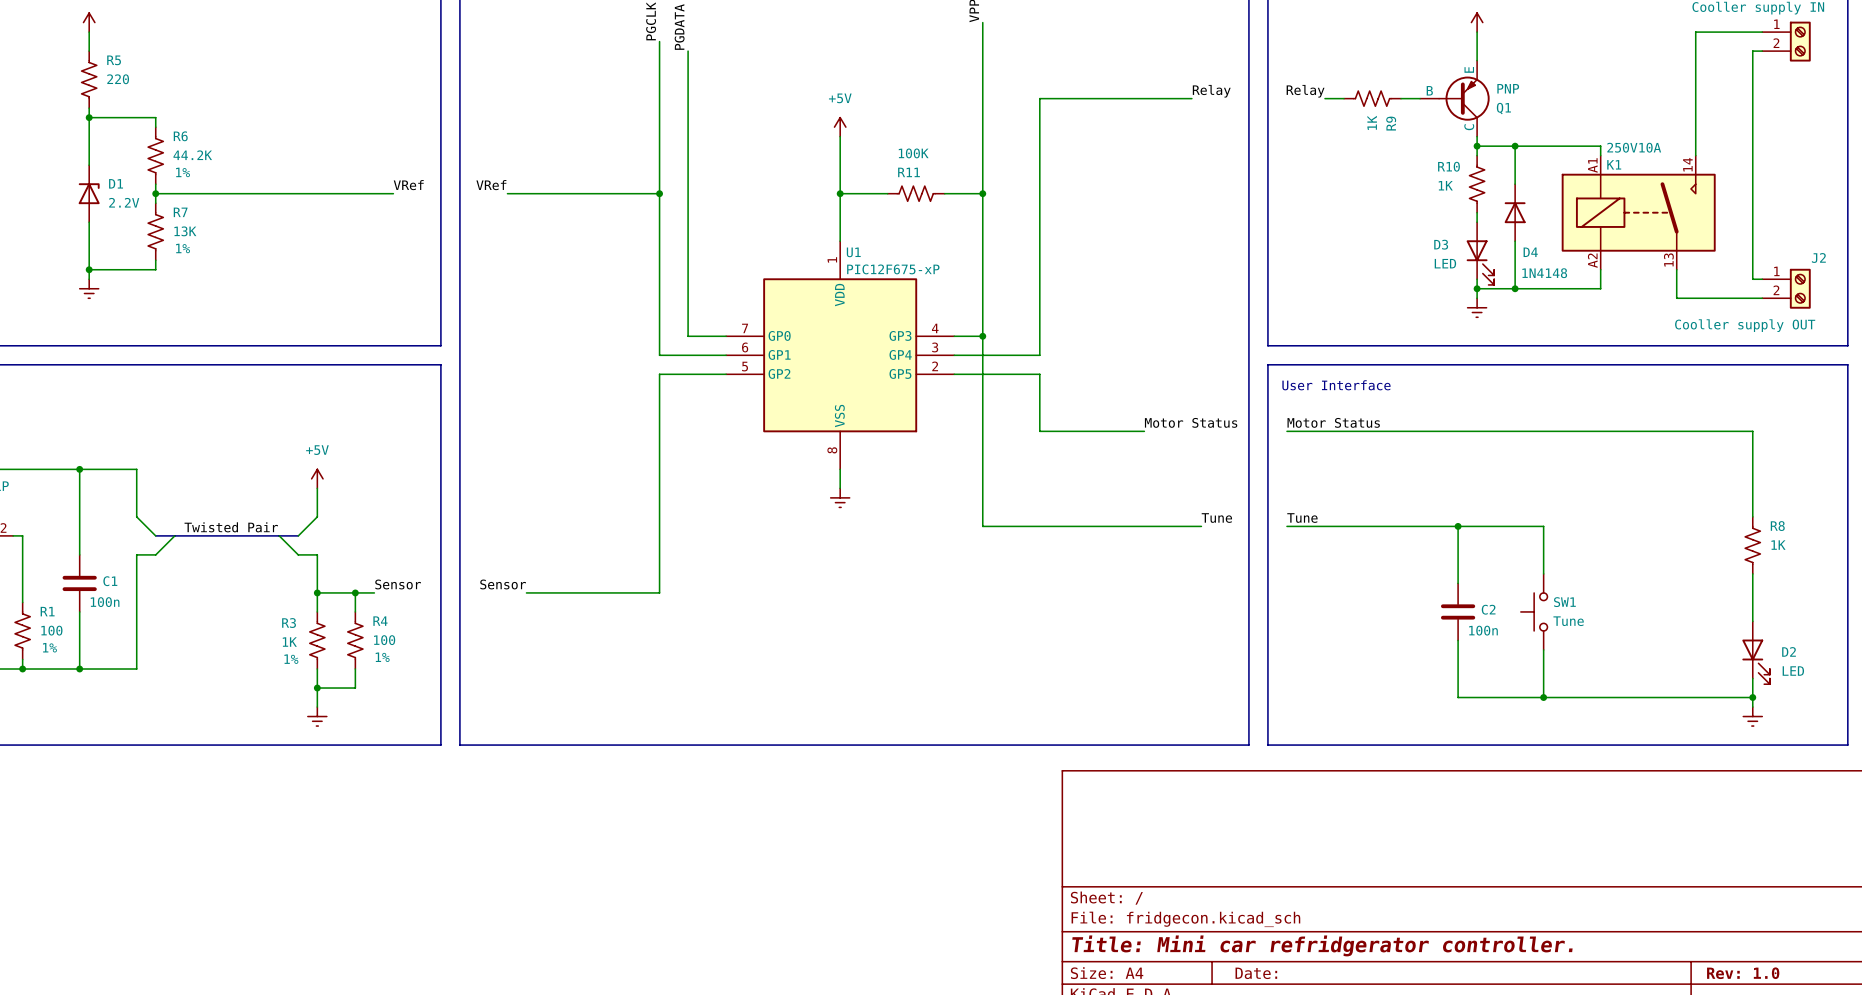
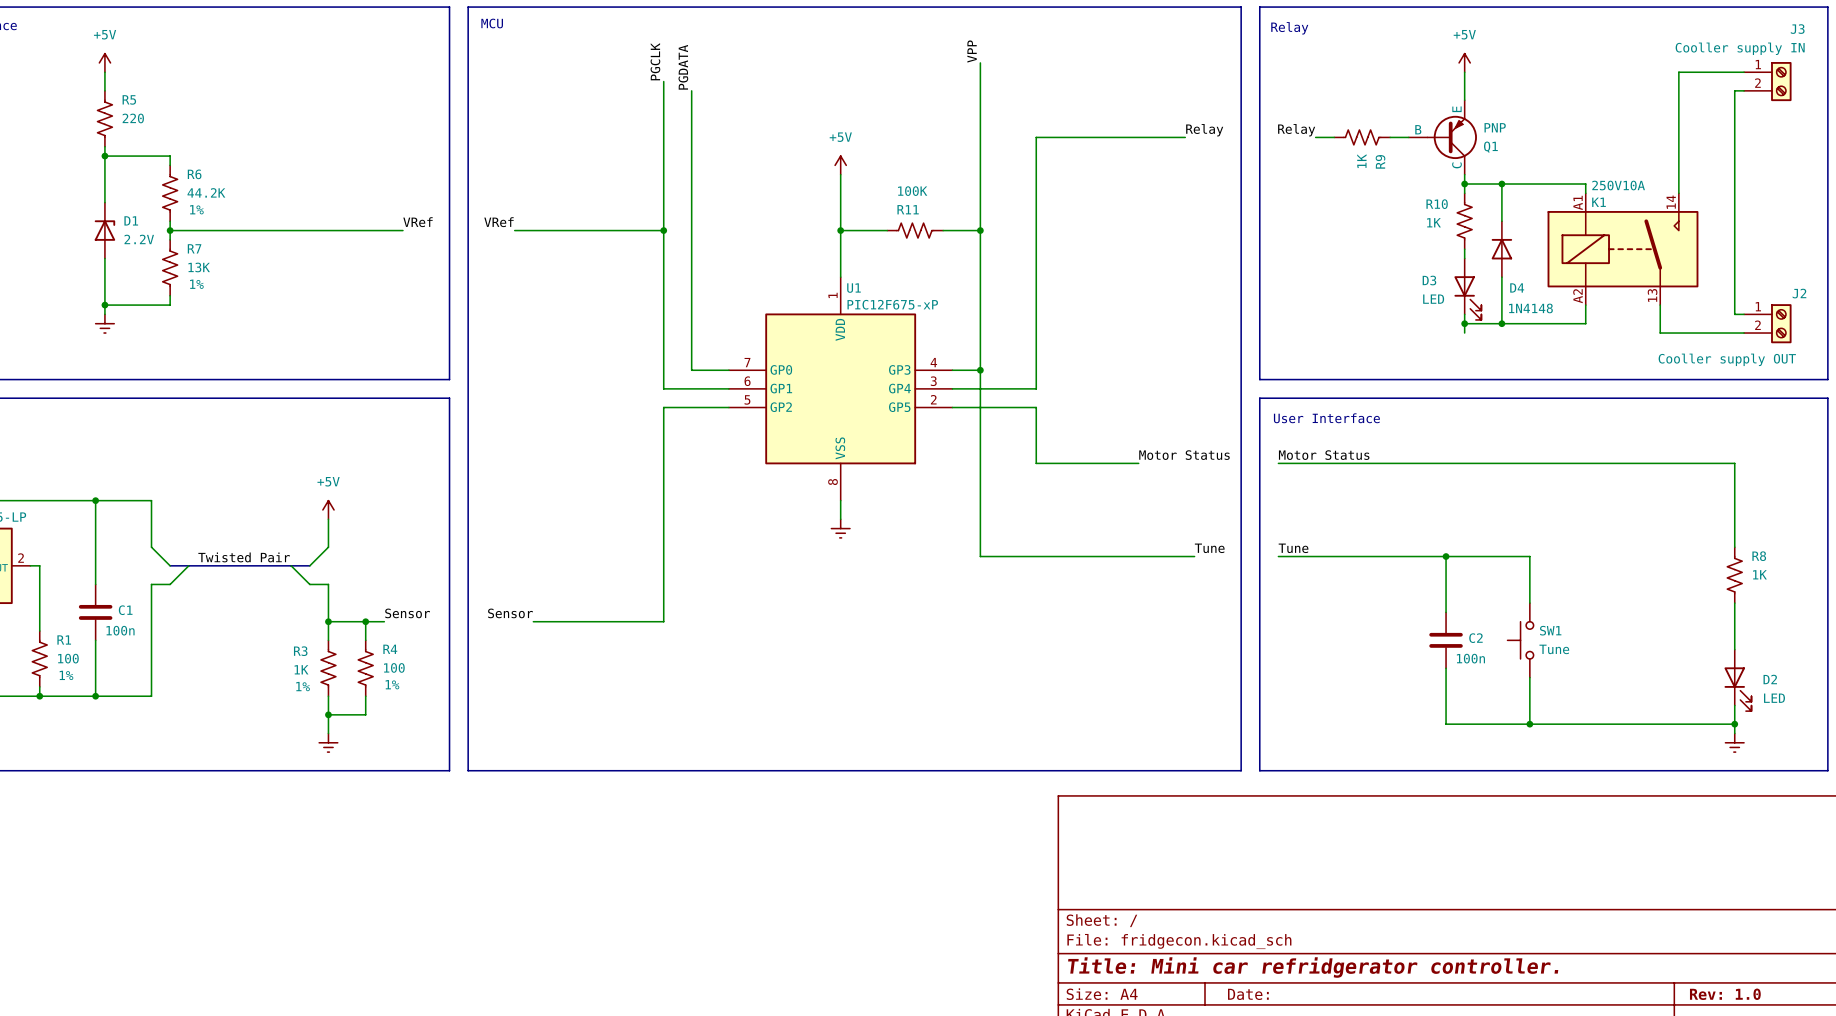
power symbol: (1477, 307) -> none

